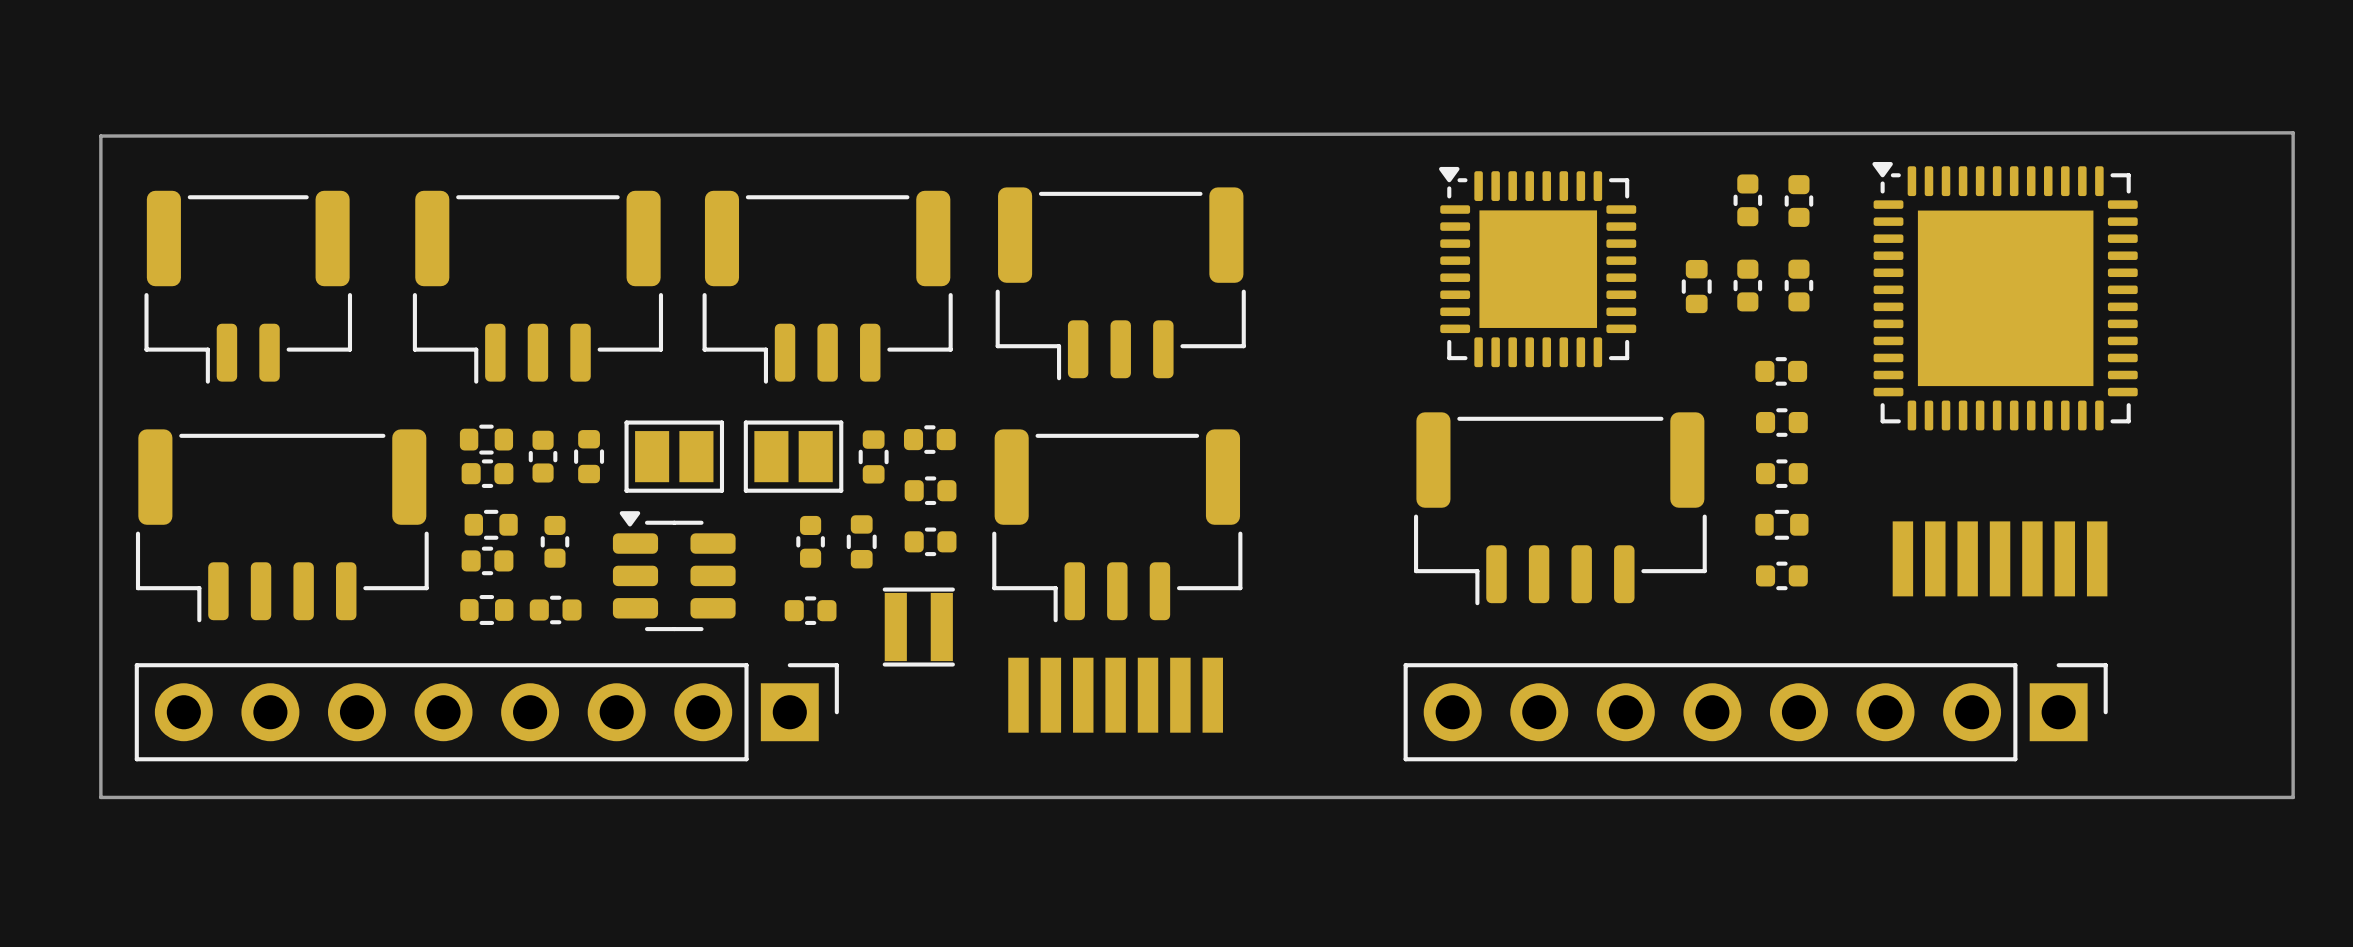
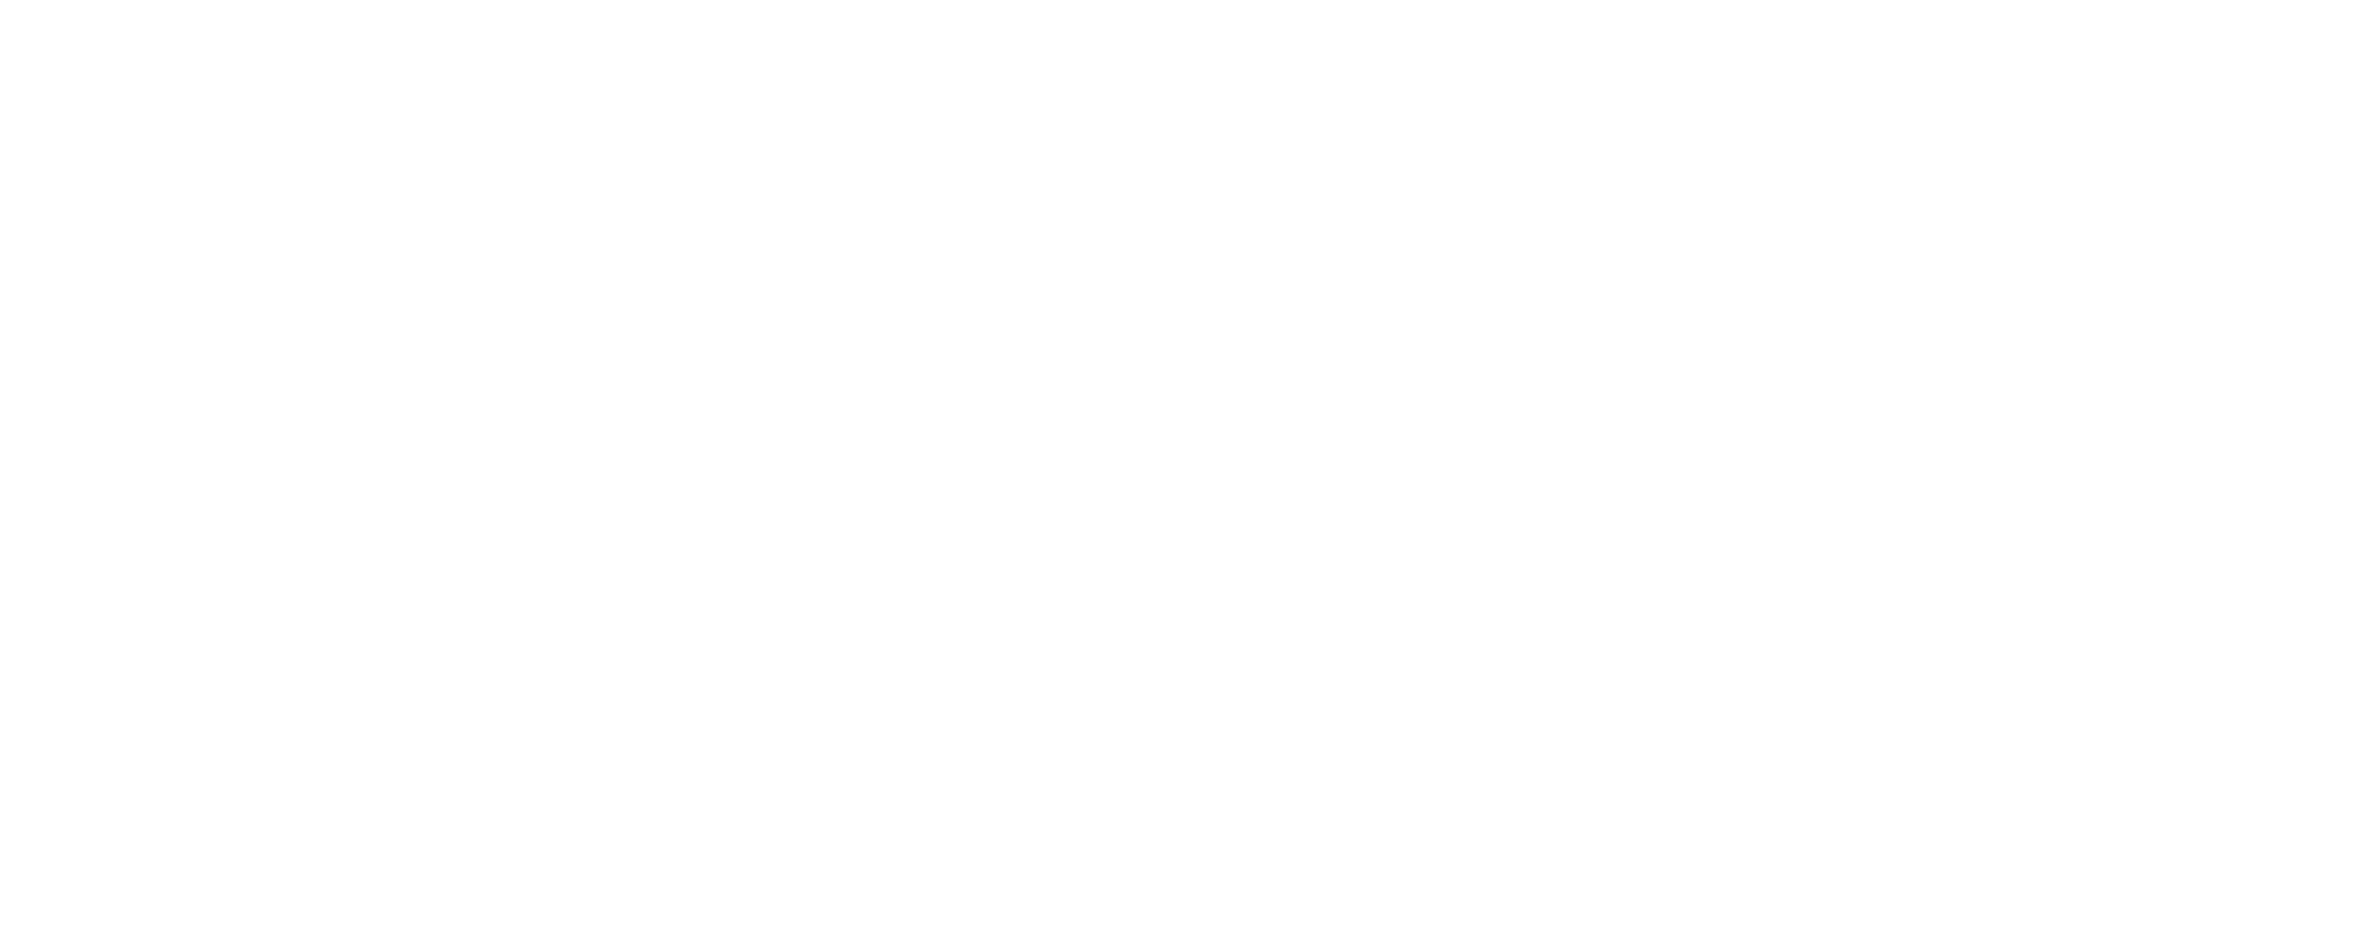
board edge: (2293, 132) (100, 136) (100, 797) (2293, 797) (2293, 132) -> none
part: (1747, 200) -> none
part: (1798, 201) -> none
part: (1537, 267) -> none
part: (1120, 283) -> none
part: (1747, 285) -> none
part: (1798, 285) -> none
part: (1696, 286) -> none
part: (248, 287) -> none
part: (537, 287) -> none
part: (827, 287) -> none
part: (2005, 296) -> none
part: (1781, 371) -> none
part: (1781, 422) -> none
part: (486, 439) -> none
part: (929, 439) -> none
part: (543, 456) -> none
part: (589, 456) -> none
part: (674, 456) -> none
part: (793, 456) -> none
part: (873, 456) -> none
part: (487, 473) -> none
part: (1781, 473) -> none
part: (930, 490) -> none
part: (1560, 508) -> none
part: (491, 524) -> none
part: (1781, 524) -> none
part: (282, 525) -> none
part: (1117, 525) -> none
part: (554, 541) -> none
part: (810, 541) -> none
part: (861, 541) -> none
part: (930, 541) -> none
part: (2000, 558) -> none
part: (487, 560) -> none
part: (674, 571) -> none
part: (1781, 575) -> none
part: (486, 609) -> none
part: (555, 609) -> none
part: (810, 610) -> none
part: (918, 627) -> none
part: (1115, 695) -> none
part: (486, 712) -> none
part: (1755, 712) -> none

